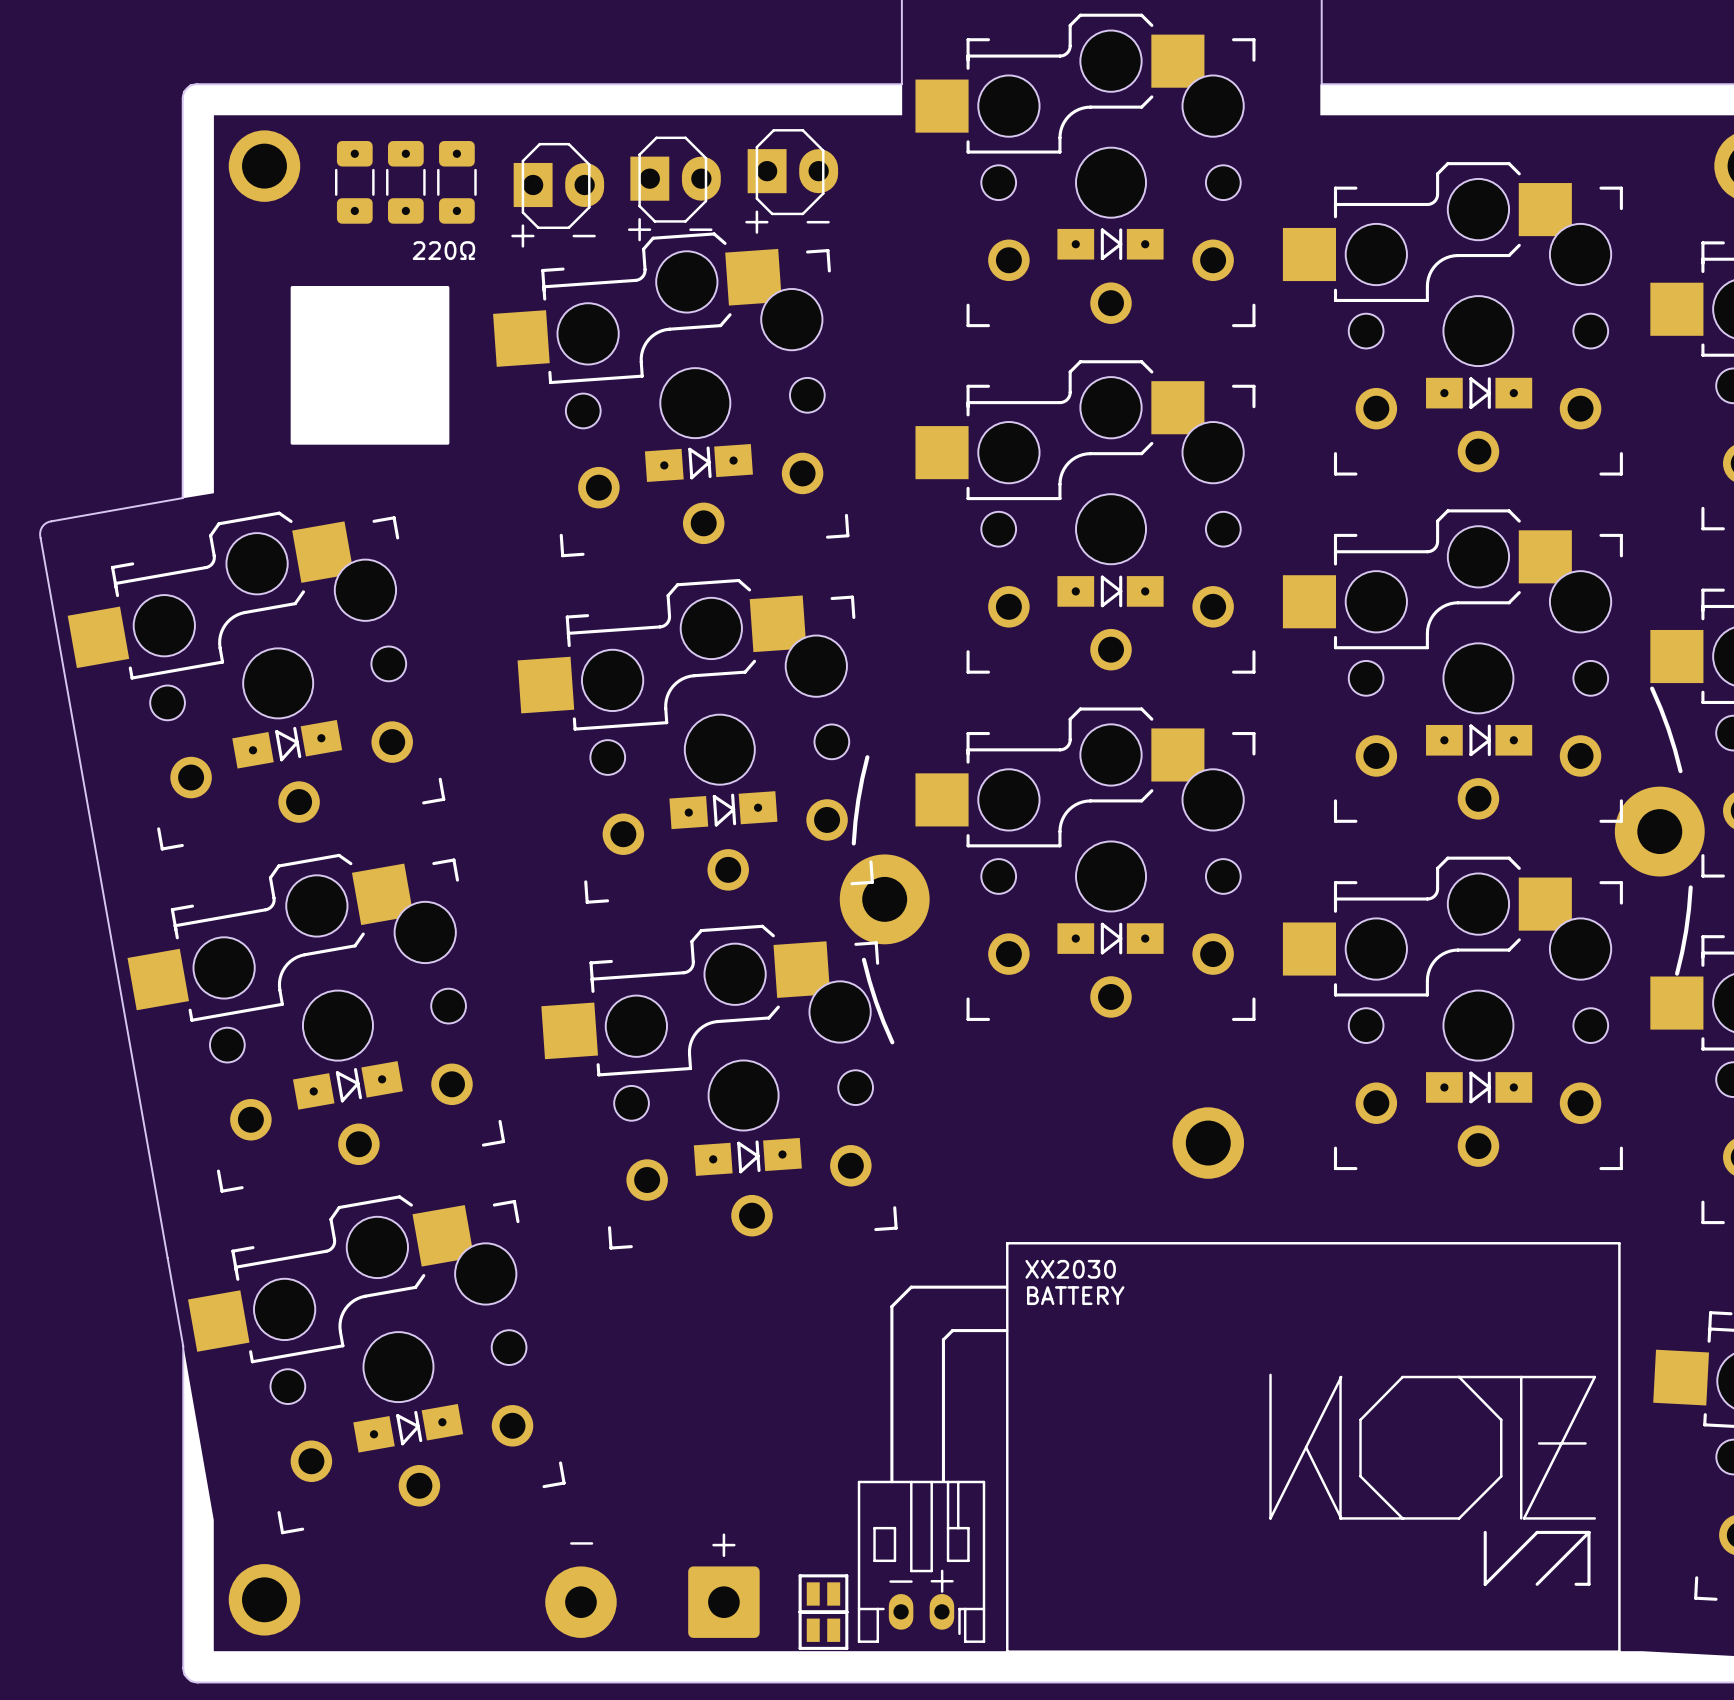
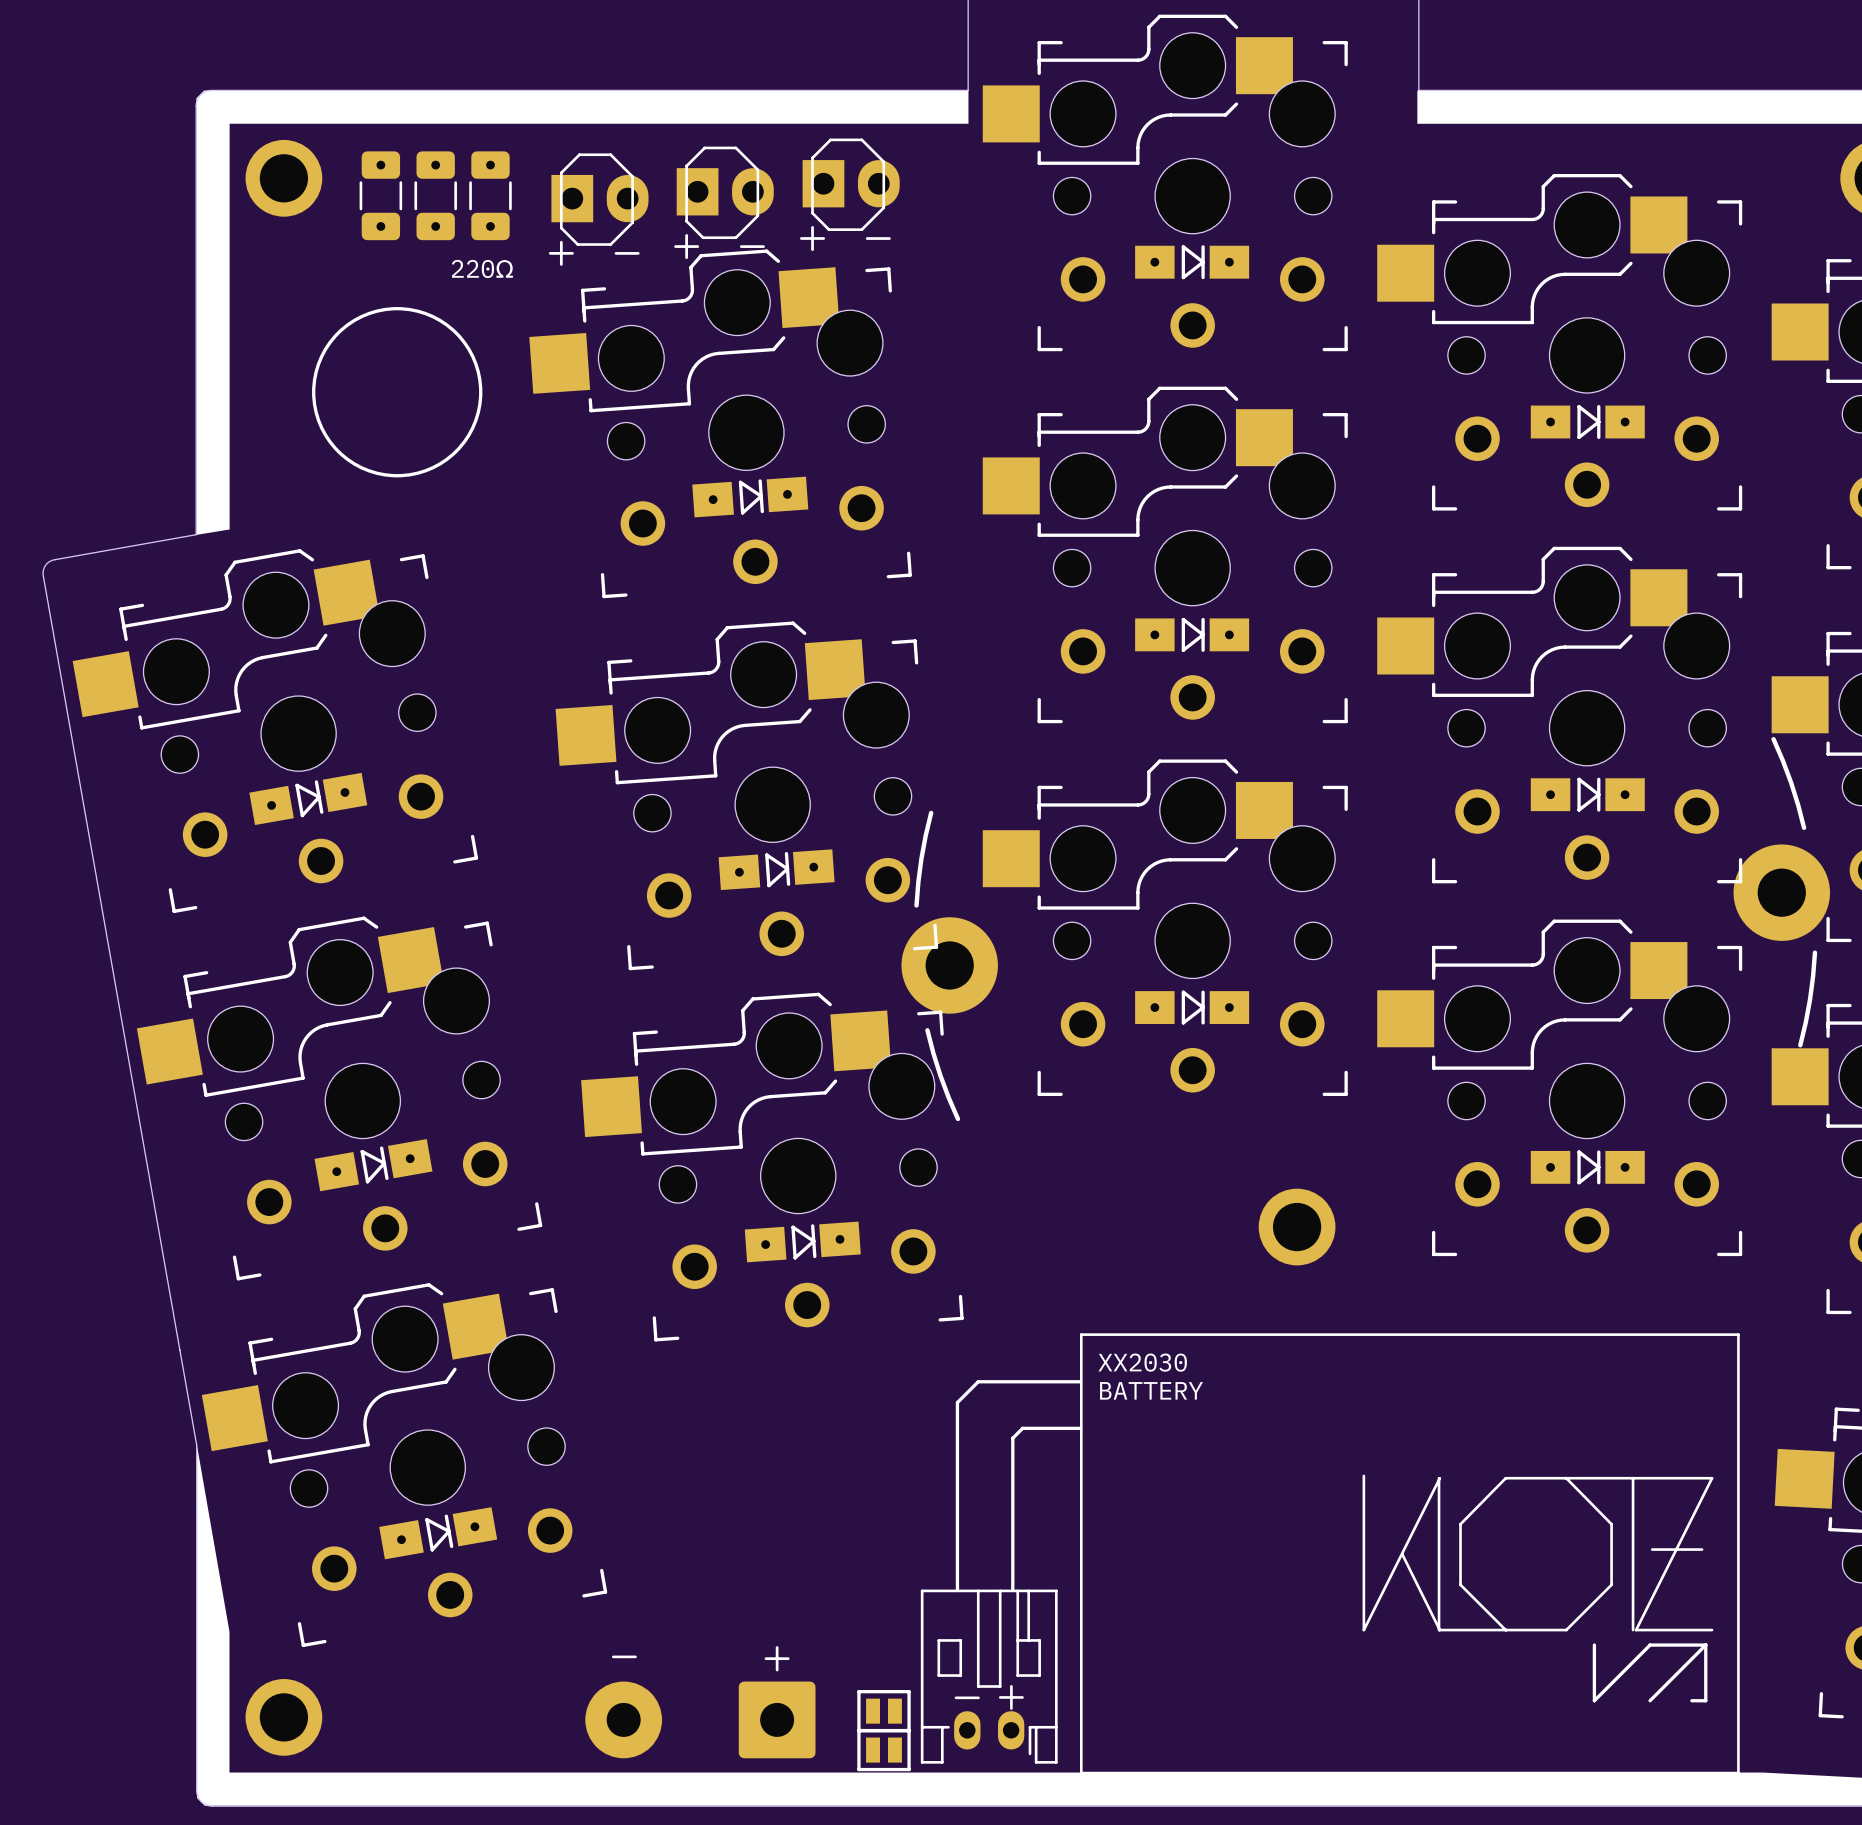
drawing shape: [290, 286, 450, 445] -> [312, 307, 483, 478]

